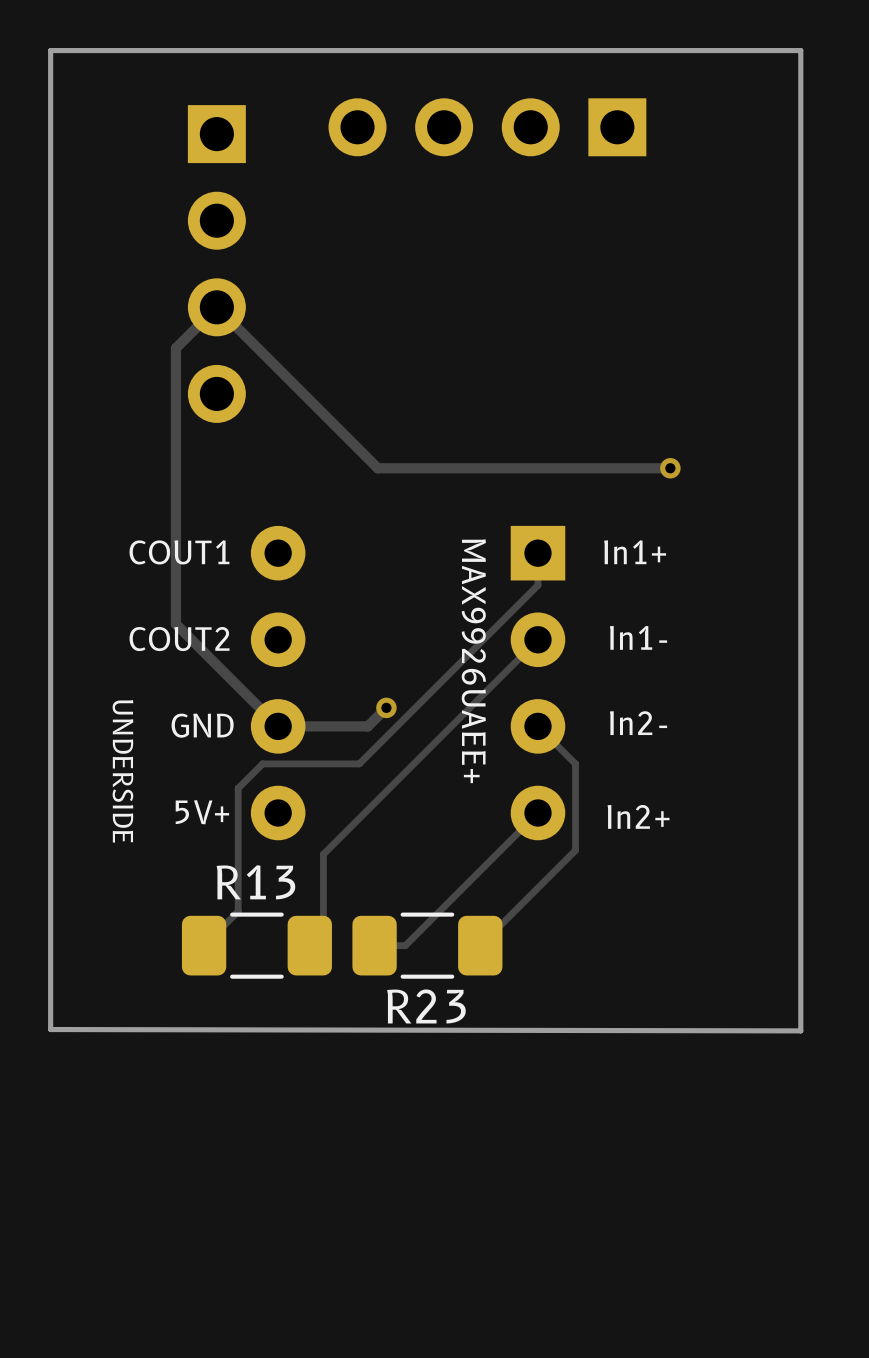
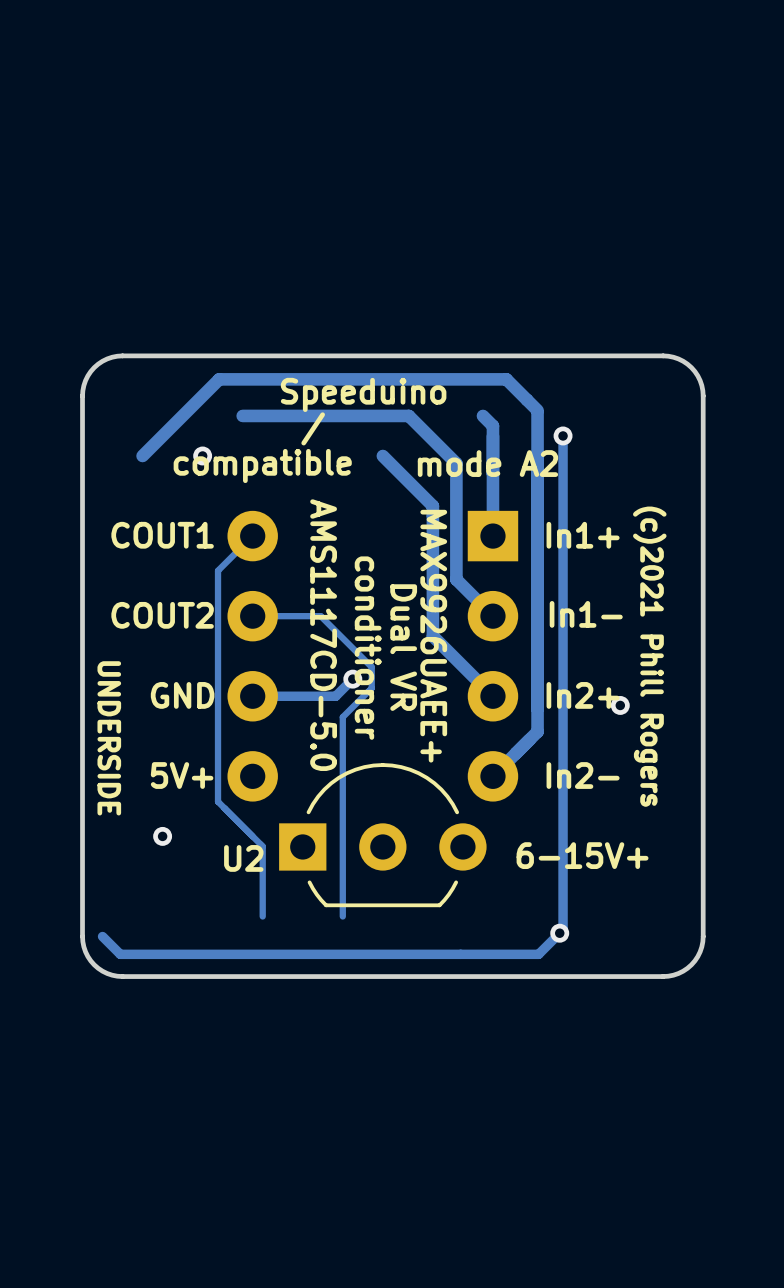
board edge: (800, 50) (800, 1030) (50, 1029) (50, 50) (800, 50) -> (663, 976) (122, 976) (107, 973) (94, 964) (85, 951) (82, 936) (82, 395) (85, 380) (94, 367) (107, 358) (122, 355) (663, 355) (678, 358) (691, 367) (700, 380) (703, 395) (703, 936) (700, 951) (691, 964) (678, 973) (663, 976)
part: (487, 127) -> none
part: (216, 264) -> none
text: none -> Speeduino (363, 394)
track: none -> (537, 410) (506, 379) (219, 379) (142, 455)
text: none -> / (313, 428)
track: none -> (563, 435) (563, 929) (538, 954) (120, 954) (102, 936)
via: none -> (202, 455)
track: (670, 468) (377, 468) (216, 307) (175, 348) (175, 624) (278, 726) -> none
via position: (670, 468) -> (563, 435)
text: none -> mode A2 (487, 463)
text: none -> compatible (262, 466)
track: none -> (252, 536) (218, 570) (218, 801) (262, 846) (262, 916)
track: (537, 553) (537, 585) (359, 763) (262, 763) (238, 788) (238, 911) (204, 945) -> (492, 536) (492, 425) (482, 415)
track: none -> (252, 616) (320, 616) (371, 667) (371, 688) (342, 717) (342, 916)
track: (537, 639) (323, 854) (323, 932) (309, 945) -> (492, 616) (456, 579) (456, 463) (408, 415) (242, 415)
text: none -> AMS1117CD-5.0 (323, 635)
text: none -> conditioner (368, 648)
text: none -> Dual VR (403, 647)
text: none -> (c)2021 Phill Rogers (649, 656)
text position: In2- (638, 723) -> In2- (583, 775)
track: (537, 726) (575, 763) (575, 850) (480, 945) -> (492, 696) (432, 636) (432, 506) (382, 455)
via: none -> (620, 705)
track: (537, 813) (405, 945) (374, 945) -> (492, 776) (537, 731) (537, 412)
text position: In2+ (638, 816) -> In2+ (583, 695)
U2: none -> (382, 835)
via: none -> (162, 836)
text: none -> 6-15V+ (582, 855)
R13: (256, 945) -> none
R23: (427, 945) -> none
via: none -> (559, 933)

